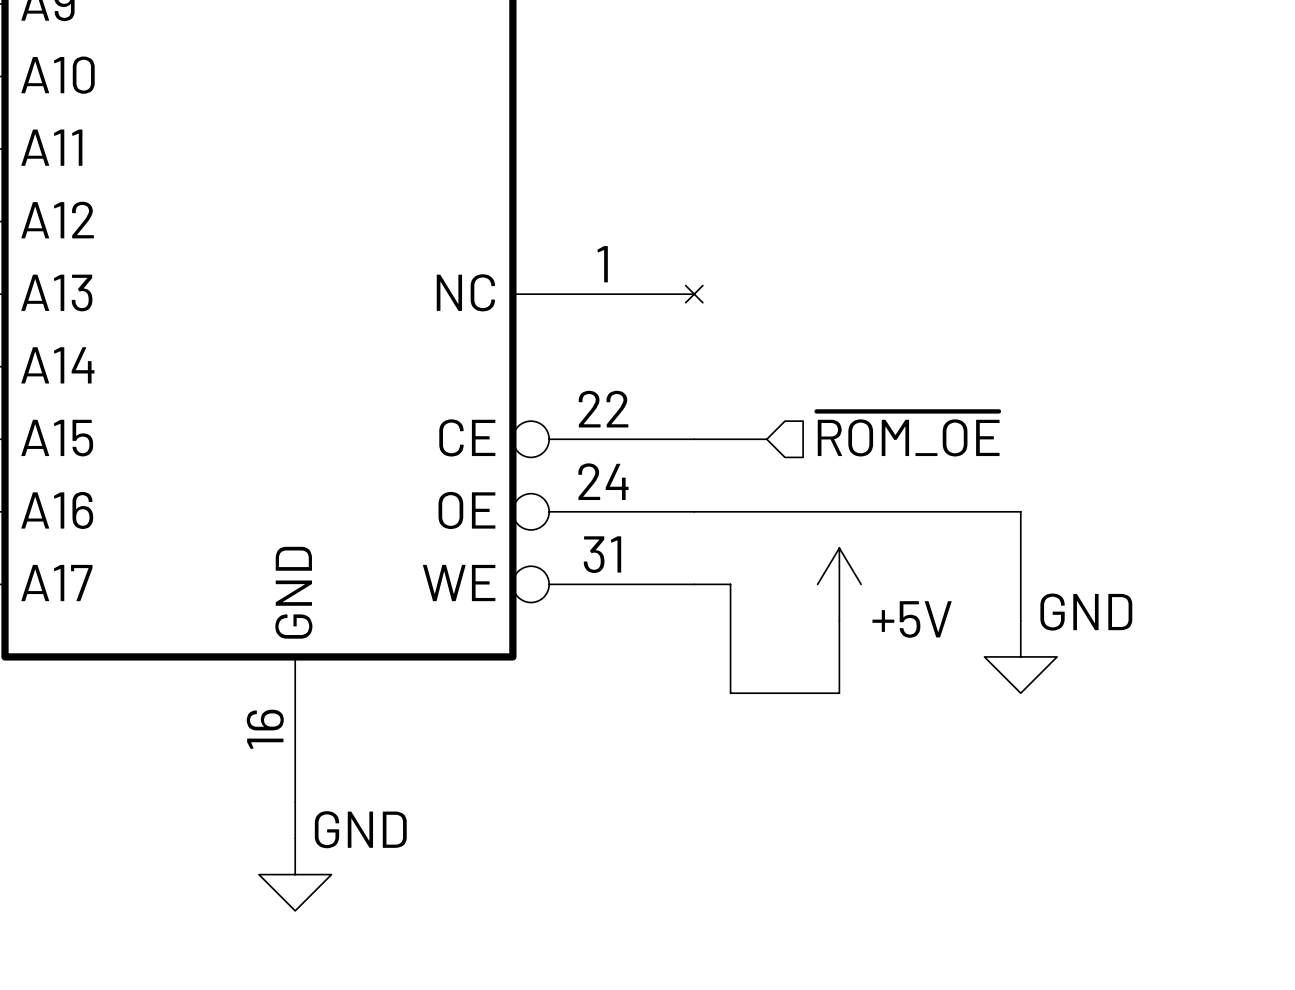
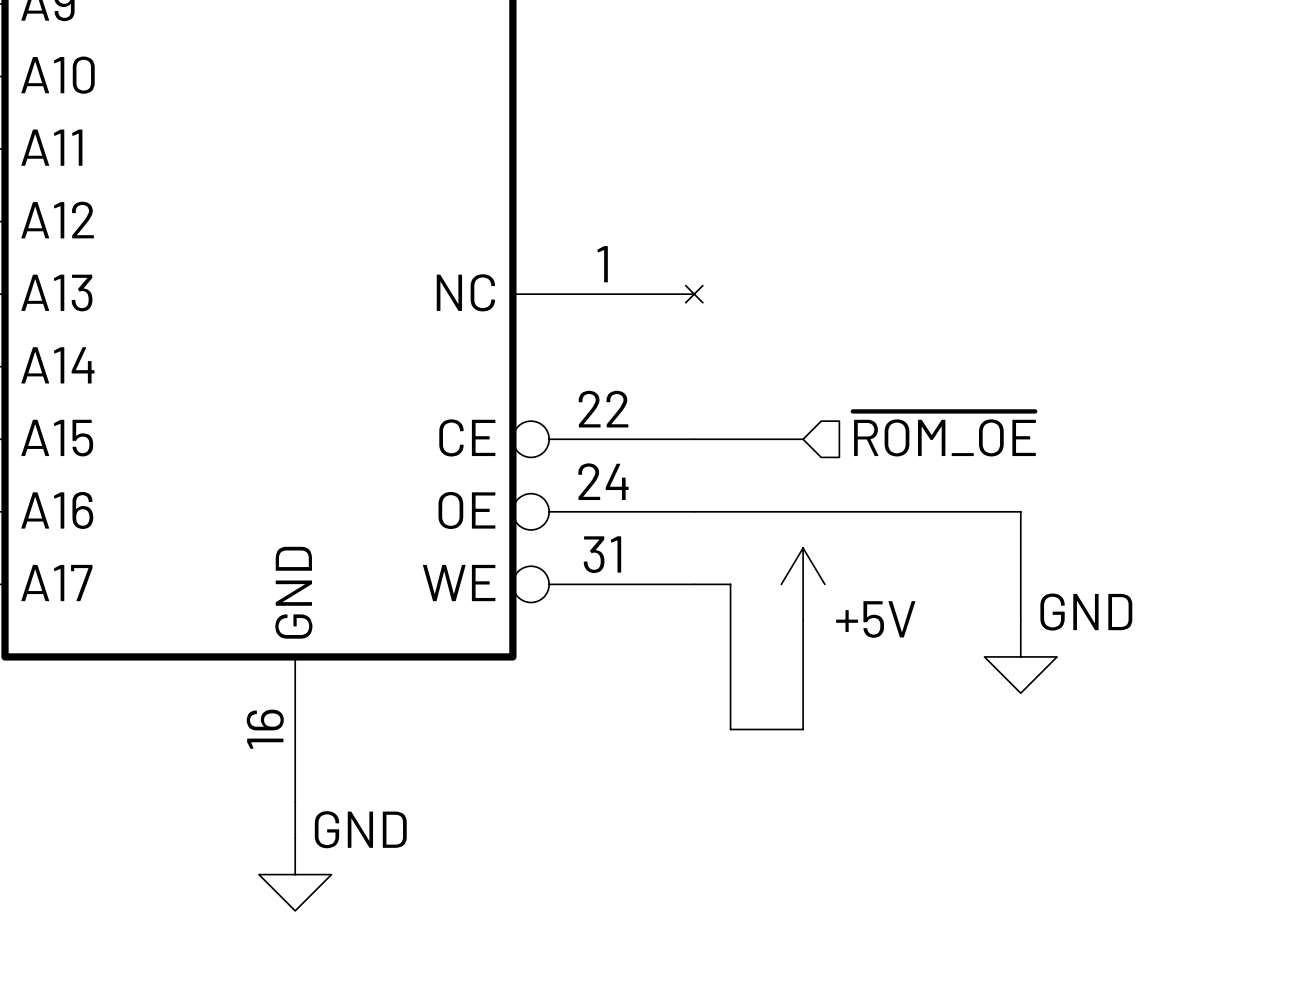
hierarchical label position: ~{ROM_OE} (908, 433) -> ~{ROM_OE} (944, 433)
wire: none -> (766, 439) (803, 439)
power symbol position: +5V (839, 584) -> +5V (803, 584)
wire: (839, 620) (839, 693) (730, 693) -> (803, 620) (803, 729) (730, 729) (730, 693)

